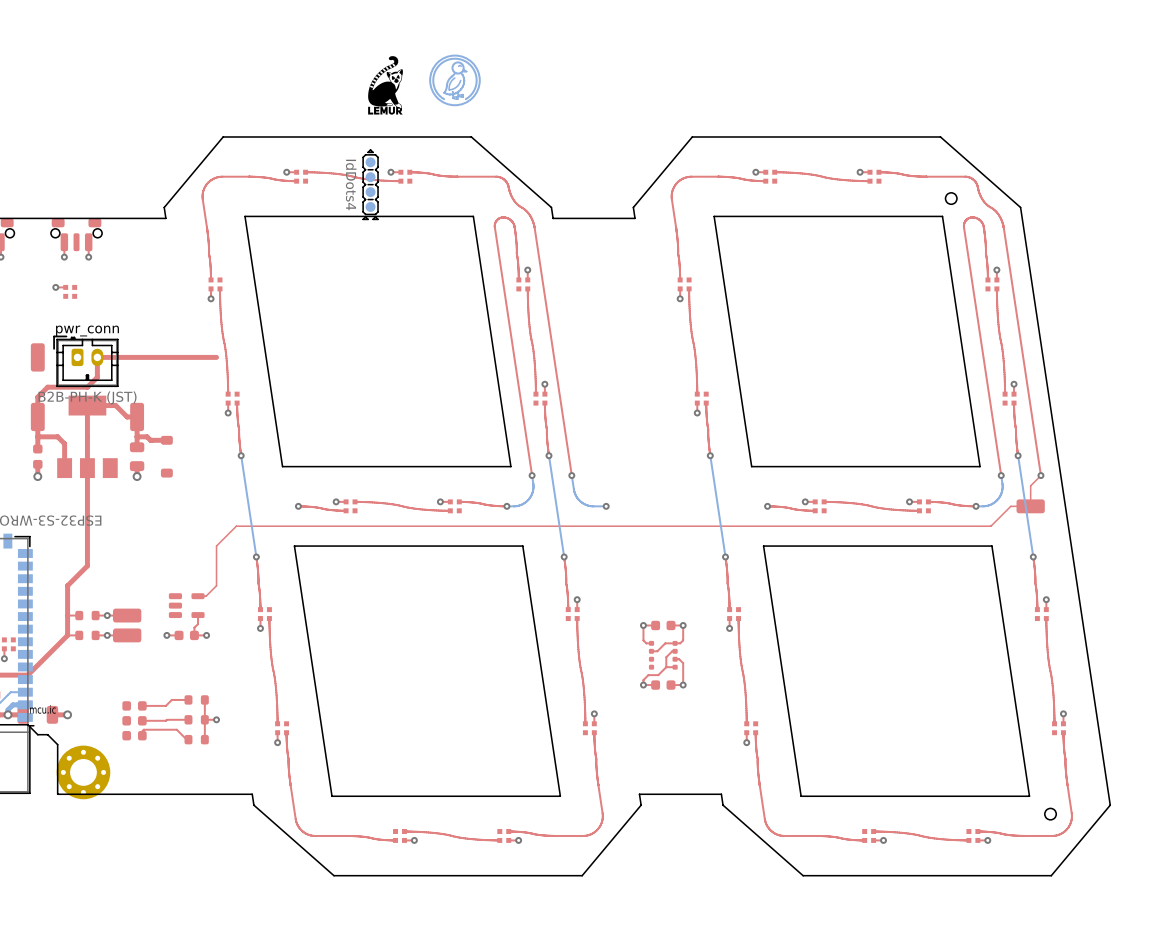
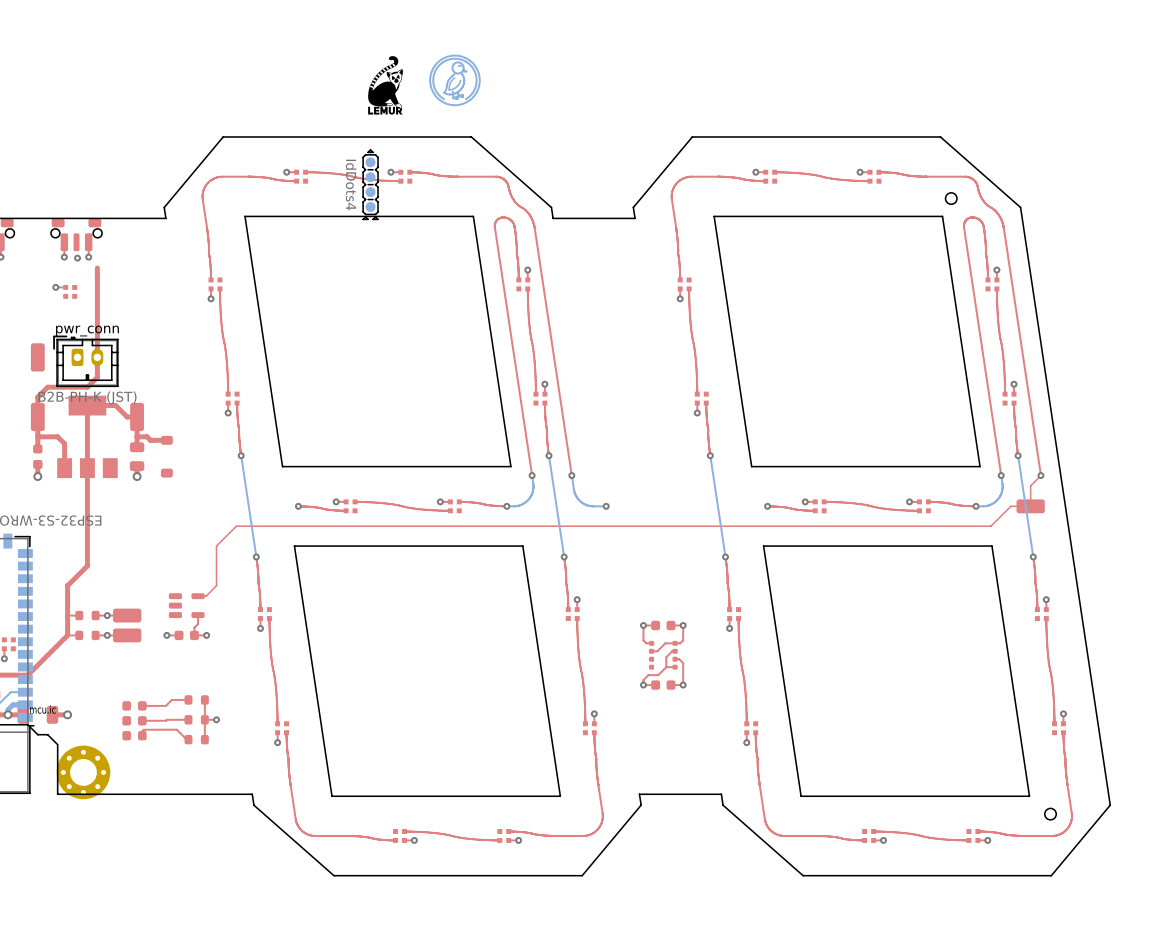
via: none -> (77, 258)
top track: (216, 357) (97, 357) -> (97, 268) (97, 357)

